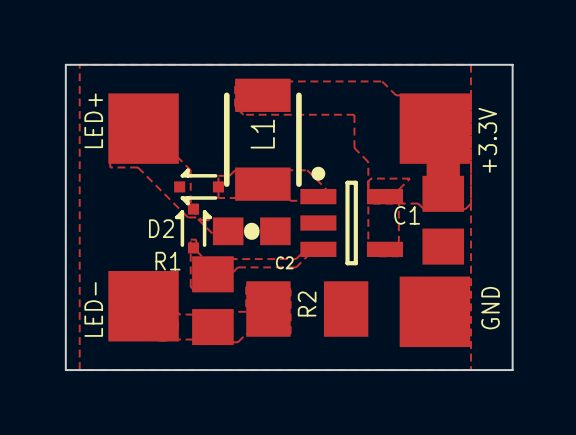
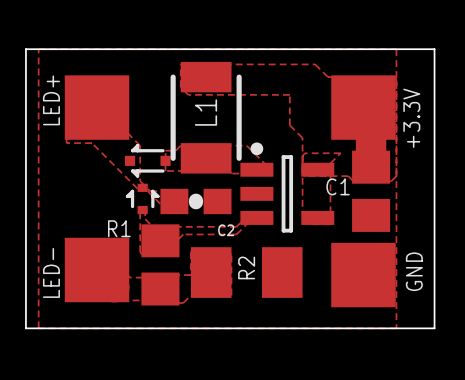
part footprint: [175, 203, 212, 254] -> [125, 183, 160, 215]
text: D2 (161, 228) -> none

